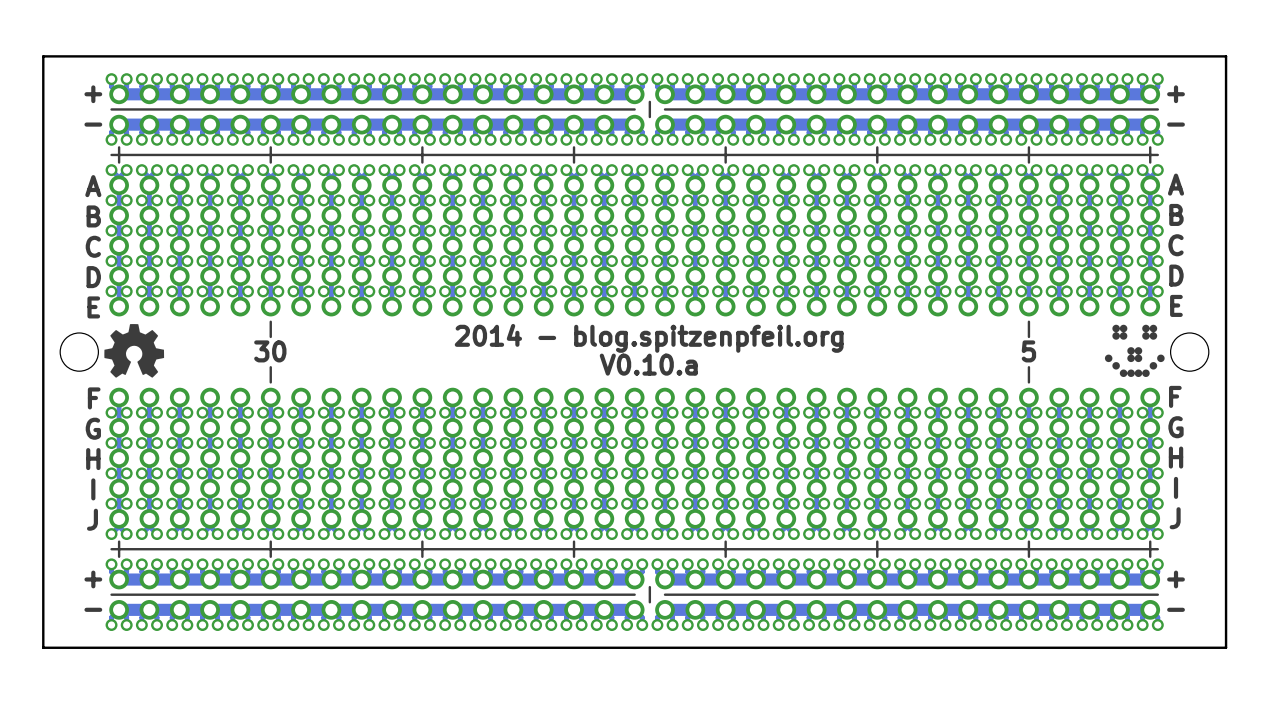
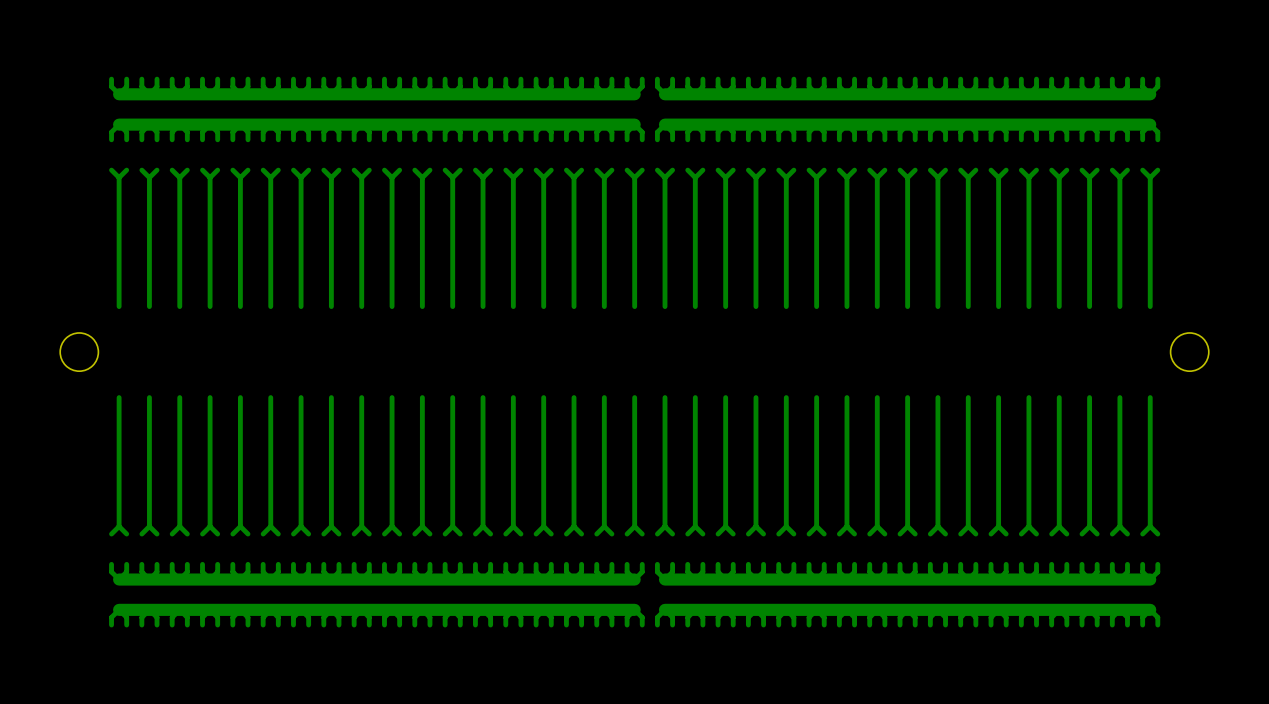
board edge: (1226, 56) (1226, 647) (43, 647) (43, 56) (1226, 56) -> none
part: (149, 79) -> none
part: (255, 79) -> none
part: (376, 79) -> none
part: (498, 79) -> none
part: (619, 79) -> none
part: (740, 79) -> none
part: (862, 79) -> none
part: (983, 79) -> none
part: (1104, 79) -> none
text: + (93, 94) -> none
part: (149, 94) -> none
part: (316, 94) -> none
part: (558, 94) -> none
part: (801, 94) -> none
part: (1044, 94) -> none
text: + (1176, 94) -> none
line: (649, 101) (649, 117) -> none
line: (634, 109) (111, 109) -> none
line: (1157, 109) (665, 109) -> none
text: - (93, 124) -> none
part: (149, 124) -> none
part: (316, 124) -> none
part: (558, 124) -> none
part: (801, 124) -> none
part: (1044, 124) -> none
text: - (1176, 124) -> none
part: (149, 139) -> none
part: (255, 139) -> none
part: (376, 139) -> none
part: (498, 139) -> none
part: (619, 139) -> none
part: (740, 139) -> none
part: (862, 139) -> none
part: (983, 139) -> none
part: (1104, 139) -> none
line: (119, 147) (119, 162) -> none
line: (270, 147) (270, 162) -> none
line: (422, 147) (422, 162) -> none
line: (574, 147) (574, 162) -> none
line: (725, 147) (725, 162) -> none
line: (877, 147) (877, 162) -> none
line: (1028, 147) (1028, 162) -> none
line: (1150, 147) (1150, 162) -> none
line: (1157, 154) (111, 154) -> none
part: (149, 170) -> none
part: (255, 170) -> none
part: (376, 170) -> none
part: (498, 170) -> none
part: (619, 170) -> none
part: (740, 170) -> none
part: (862, 170) -> none
part: (983, 170) -> none
part: (1104, 170) -> none
text: A (1176, 184) -> none
part: (149, 185) -> none
part: (316, 185) -> none
part: (558, 185) -> none
part: (801, 185) -> none
part: (1044, 185) -> none
text: A (93, 186) -> none
part: (149, 200) -> none
part: (255, 200) -> none
part: (376, 200) -> none
part: (498, 200) -> none
part: (619, 200) -> none
part: (740, 200) -> none
part: (862, 200) -> none
part: (983, 200) -> none
part: (1104, 200) -> none
text: B (1176, 214) -> none
part: (149, 215) -> none
part: (316, 215) -> none
part: (558, 215) -> none
part: (801, 215) -> none
part: (1044, 215) -> none
text: B (93, 216) -> none
part: (149, 230) -> none
part: (255, 230) -> none
part: (376, 230) -> none
part: (498, 230) -> none
part: (619, 230) -> none
part: (740, 230) -> none
part: (862, 230) -> none
part: (983, 230) -> none
part: (1104, 230) -> none
part: (149, 245) -> none
part: (316, 245) -> none
part: (558, 245) -> none
part: (801, 245) -> none
part: (1044, 245) -> none
text: C (1176, 245) -> none
text: C (93, 246) -> none
part: (149, 261) -> none
part: (255, 261) -> none
part: (376, 261) -> none
part: (498, 261) -> none
part: (619, 261) -> none
part: (740, 261) -> none
part: (862, 261) -> none
part: (983, 261) -> none
part: (1104, 261) -> none
text: D (1176, 275) -> none
part: (149, 276) -> none
part: (316, 276) -> none
part: (558, 276) -> none
part: (801, 276) -> none
part: (1044, 276) -> none
text: D (93, 277) -> none
part: (149, 291) -> none
part: (255, 291) -> none
part: (376, 291) -> none
part: (498, 291) -> none
part: (619, 291) -> none
part: (740, 291) -> none
part: (862, 291) -> none
part: (983, 291) -> none
part: (1104, 291) -> none
text: E (1176, 305) -> none
part: (149, 306) -> none
part: (316, 306) -> none
part: (558, 306) -> none
part: (801, 306) -> none
part: (1044, 306) -> none
text: E (93, 307) -> none
line: (270, 321) (270, 336) -> none
line: (1028, 321) (1028, 336) -> none
drawing: [104, 324, 165, 378] -> none
drawing: [1104, 324, 1165, 378] -> none
text: 2014 - blog.spitzenpfeil.org (649, 338) -> none
text: 30 (270, 351) -> none
text: 5 (1028, 351) -> none
text: V0.10.a (648, 364) -> none
line: (270, 367) (270, 382) -> none
line: (1028, 367) (1028, 382) -> none
text: F (1175, 396) -> none
part: (149, 397) -> none
part: (316, 397) -> none
part: (558, 397) -> none
part: (801, 397) -> none
part: (1044, 397) -> none
text: F (94, 398) -> none
part: (149, 412) -> none
part: (255, 412) -> none
part: (376, 412) -> none
part: (498, 412) -> none
part: (619, 412) -> none
part: (740, 412) -> none
part: (862, 412) -> none
part: (983, 412) -> none
part: (1104, 412) -> none
part: (149, 427) -> none
part: (316, 427) -> none
part: (558, 427) -> none
part: (801, 427) -> none
part: (1044, 427) -> none
text: G (1176, 427) -> none
text: G (93, 428) -> none
part: (149, 443) -> none
part: (255, 443) -> none
part: (376, 443) -> none
part: (498, 443) -> none
part: (619, 443) -> none
part: (740, 443) -> none
part: (862, 443) -> none
part: (983, 443) -> none
part: (1104, 443) -> none
text: H (1176, 457) -> none
part: (149, 458) -> none
part: (316, 458) -> none
part: (558, 458) -> none
part: (801, 458) -> none
part: (1044, 458) -> none
text: H (93, 459) -> none
part: (149, 473) -> none
part: (255, 473) -> none
part: (376, 473) -> none
part: (498, 473) -> none
part: (619, 473) -> none
part: (740, 473) -> none
part: (862, 473) -> none
part: (983, 473) -> none
part: (1104, 473) -> none
text: I (1176, 487) -> none
part: (149, 488) -> none
part: (316, 488) -> none
part: (558, 488) -> none
part: (801, 488) -> none
part: (1044, 488) -> none
text: I (93, 489) -> none
part: (149, 503) -> none
part: (255, 503) -> none
part: (376, 503) -> none
part: (498, 503) -> none
part: (619, 503) -> none
part: (740, 503) -> none
part: (862, 503) -> none
part: (983, 503) -> none
part: (1104, 503) -> none
part: (149, 518) -> none
part: (316, 518) -> none
part: (558, 518) -> none
part: (801, 518) -> none
part: (1044, 518) -> none
text: J (1175, 518) -> none
text: J (92, 519) -> none
part: (149, 534) -> none
part: (255, 534) -> none
part: (376, 534) -> none
part: (498, 534) -> none
part: (619, 534) -> none
part: (740, 534) -> none
part: (862, 534) -> none
part: (983, 534) -> none
part: (1104, 534) -> none
line: (119, 541) (119, 556) -> none
line: (270, 541) (270, 556) -> none
line: (422, 541) (422, 556) -> none
line: (574, 541) (574, 556) -> none
line: (725, 541) (725, 556) -> none
line: (877, 541) (877, 556) -> none
line: (1028, 541) (1028, 556) -> none
line: (1150, 541) (1150, 556) -> none
line: (1157, 549) (111, 549) -> none
part: (149, 564) -> none
part: (255, 564) -> none
part: (376, 564) -> none
part: (498, 564) -> none
part: (619, 564) -> none
part: (740, 564) -> none
part: (862, 564) -> none
part: (983, 564) -> none
part: (1104, 564) -> none
text: + (93, 579) -> none
part: (149, 579) -> none
part: (316, 579) -> none
part: (558, 579) -> none
part: (801, 579) -> none
part: (1044, 579) -> none
text: + (1176, 579) -> none
line: (649, 587) (649, 602) -> none
line: (634, 594) (111, 594) -> none
line: (1157, 594) (665, 594) -> none
text: - (93, 609) -> none
part: (149, 609) -> none
part: (316, 609) -> none
part: (558, 609) -> none
part: (801, 609) -> none
part: (1044, 609) -> none
text: - (1176, 609) -> none
part: (149, 625) -> none
part: (255, 625) -> none
part: (376, 625) -> none
part: (498, 625) -> none
part: (619, 625) -> none
part: (740, 625) -> none
part: (862, 625) -> none
part: (983, 625) -> none
part: (1104, 625) -> none

